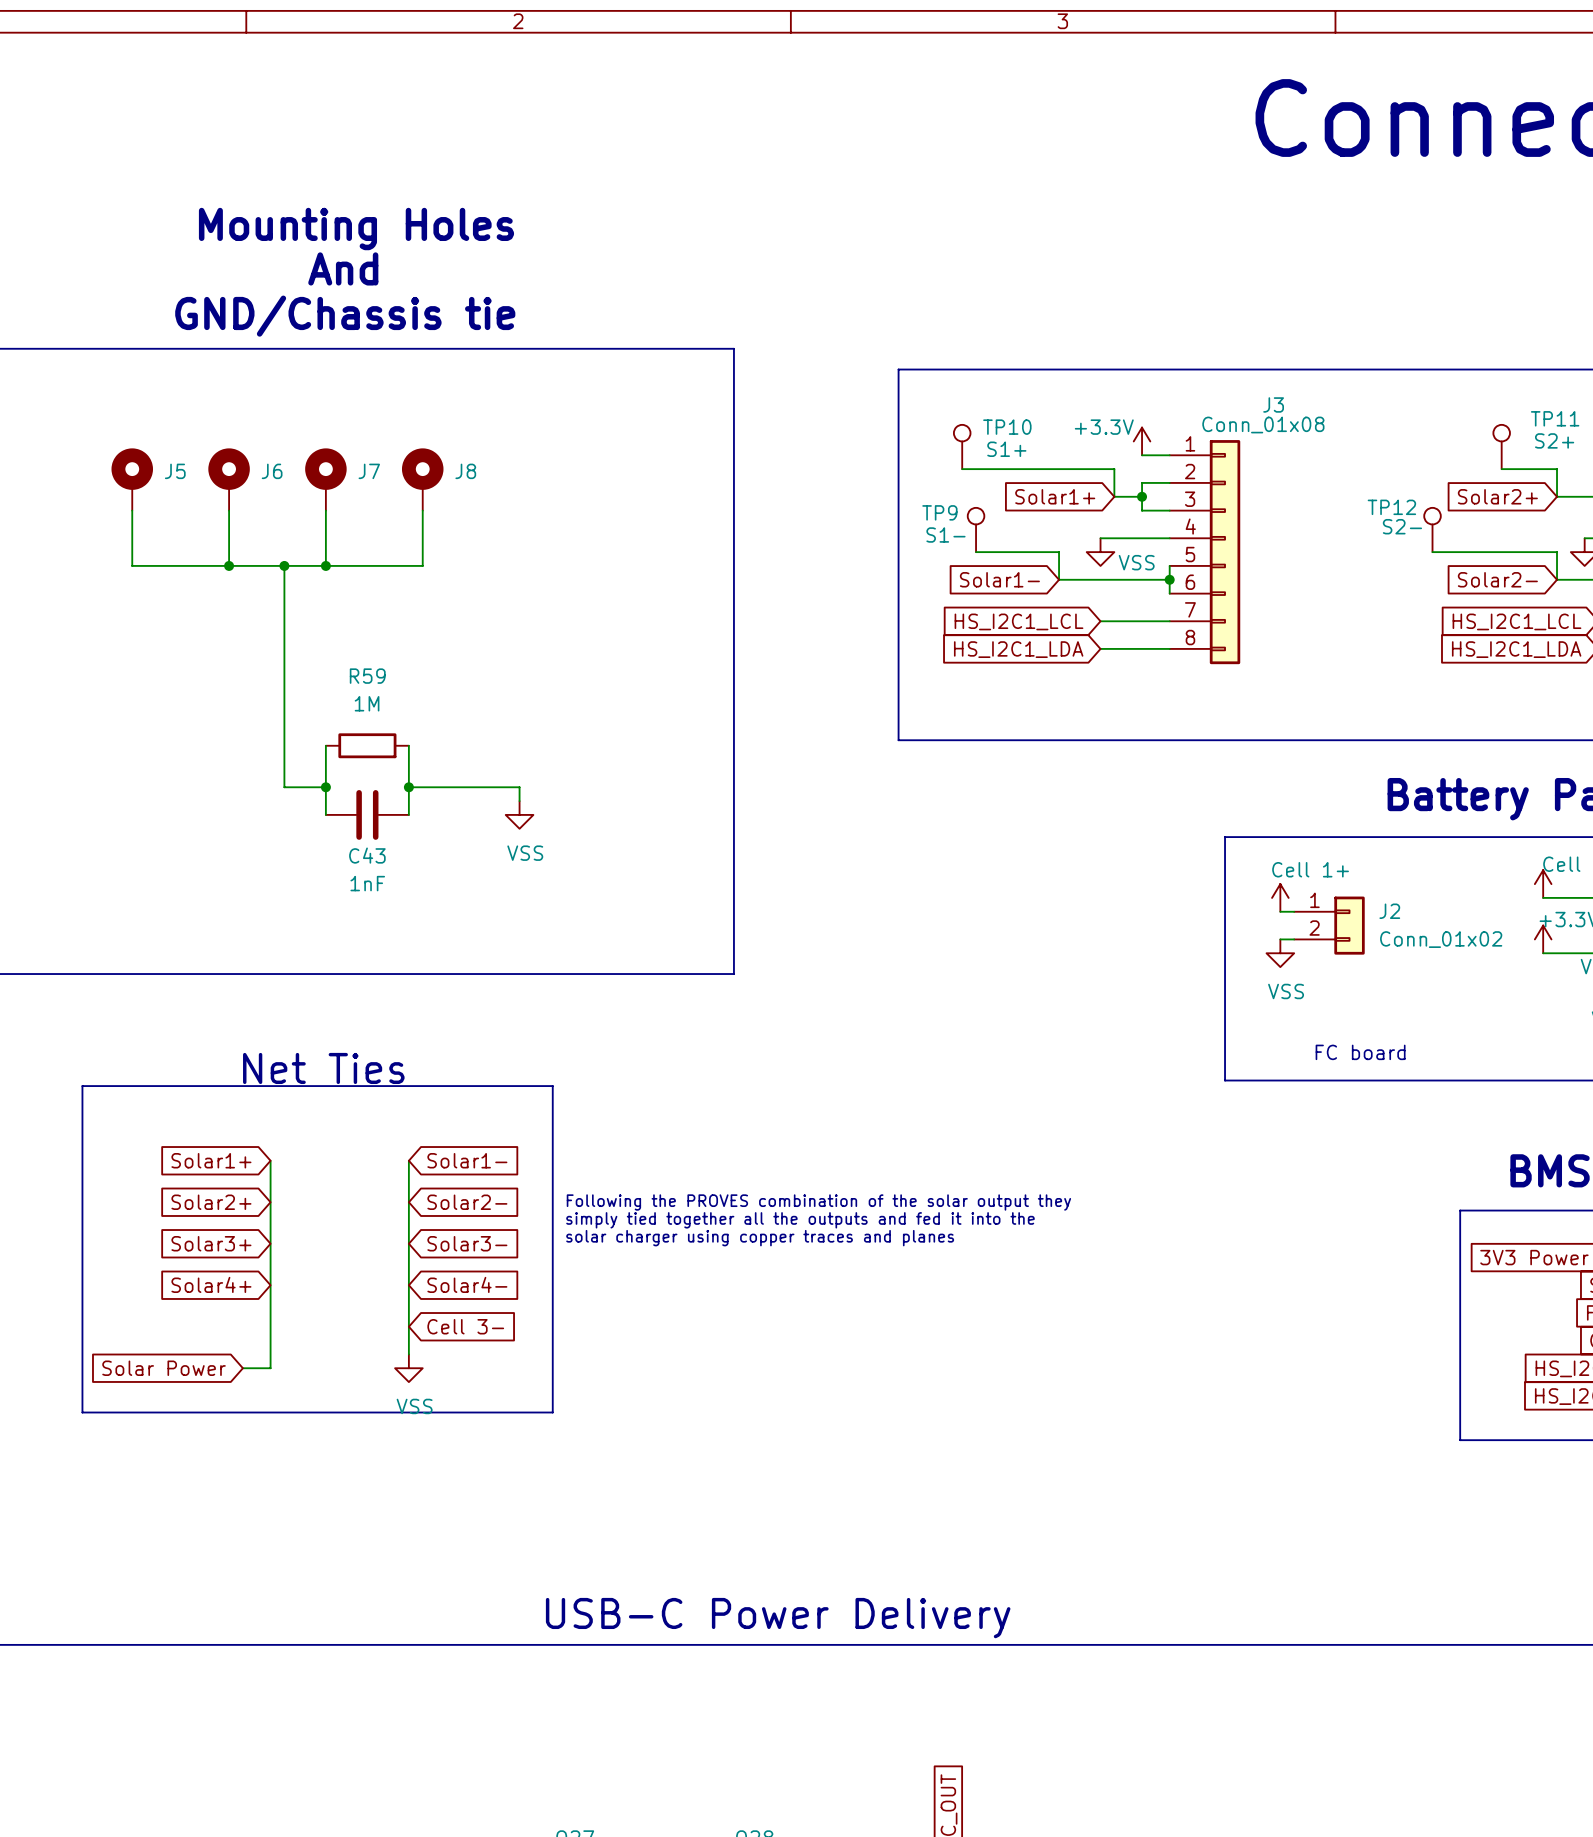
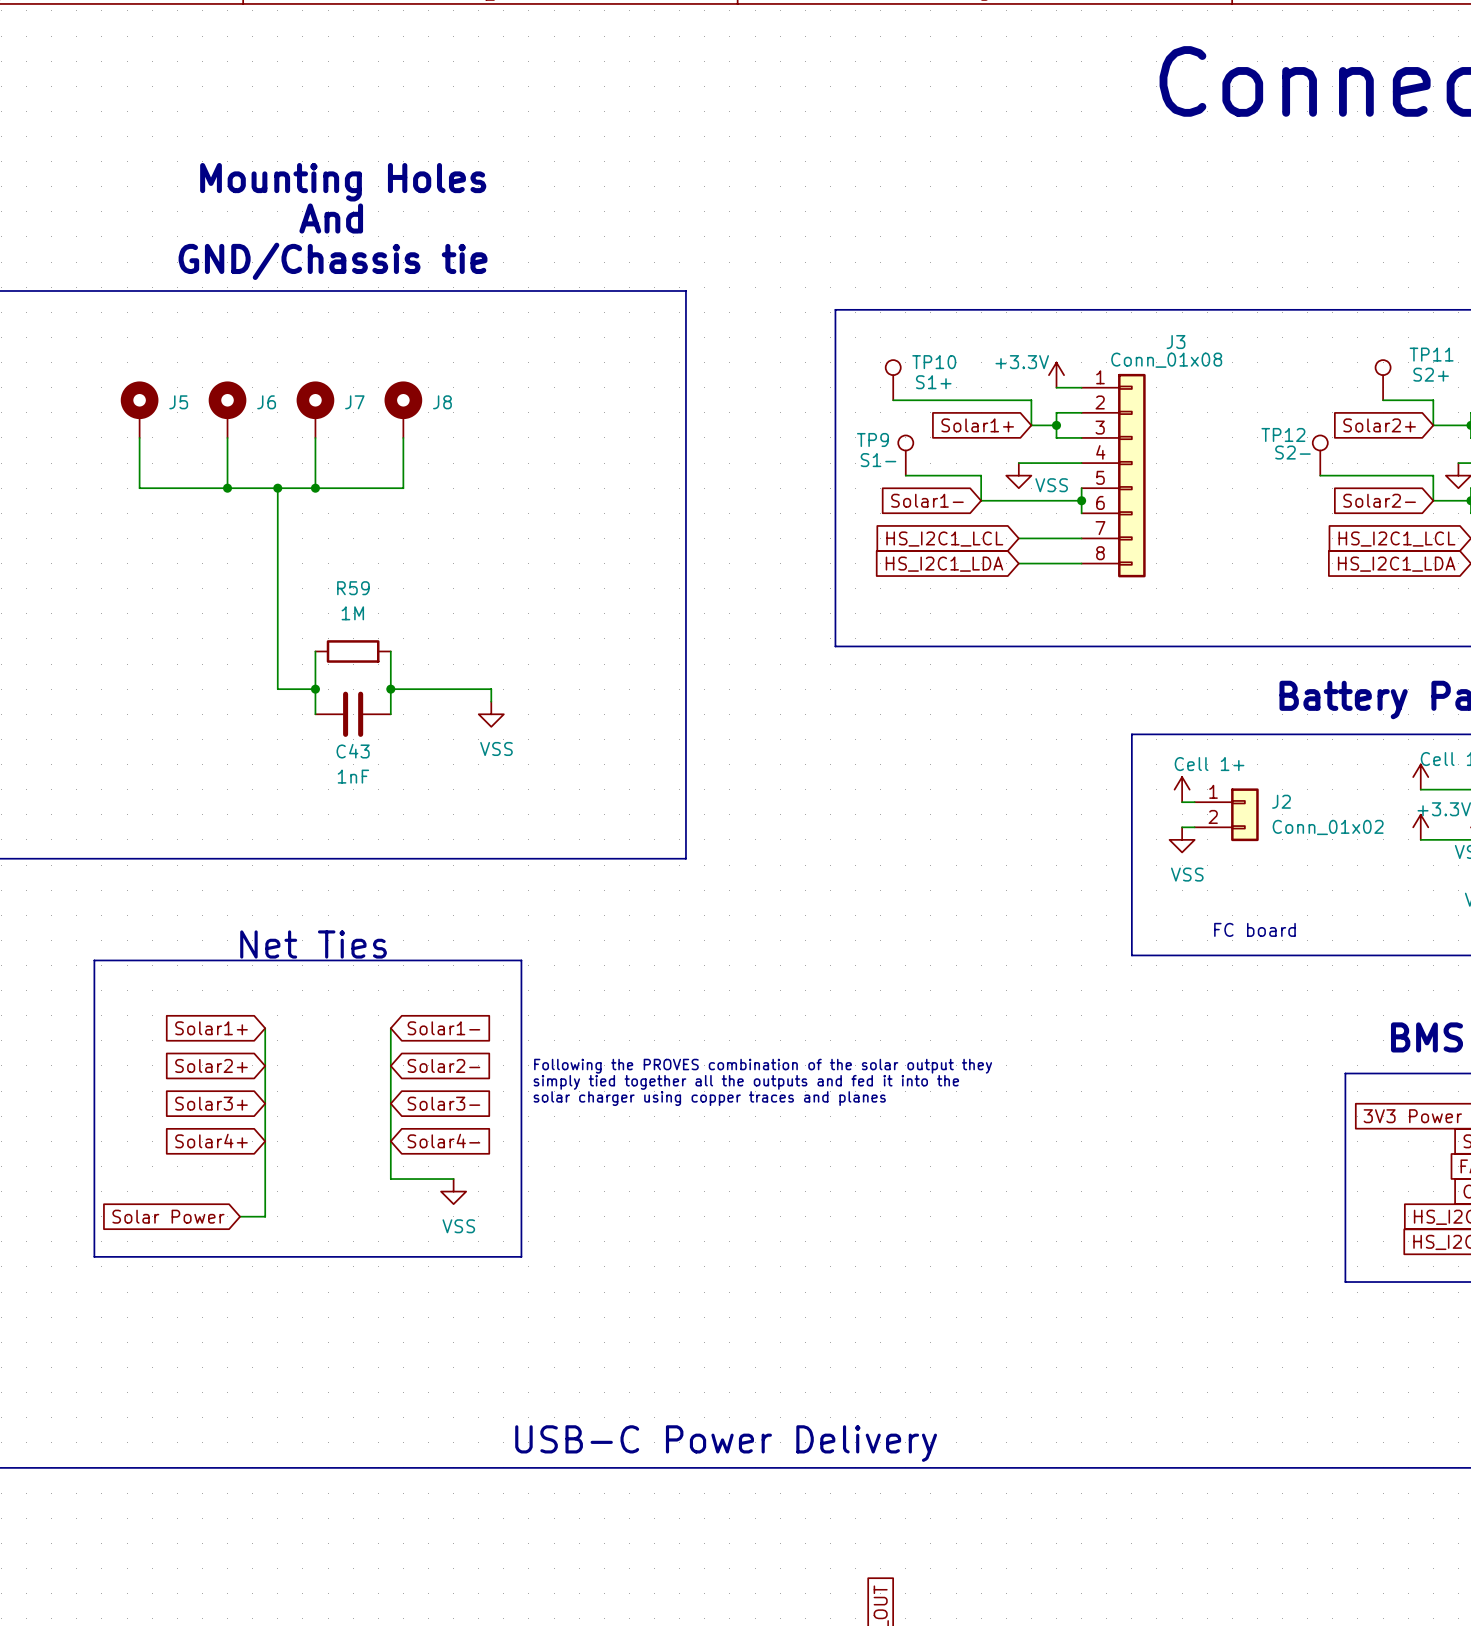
wire: (408, 1326) (408, 1354) -> (390, 1179) (453, 1179)
global label: Cell 3- (465, 1326) -> none
power symbol position: VSS (408, 1368) -> VSS (453, 1191)

